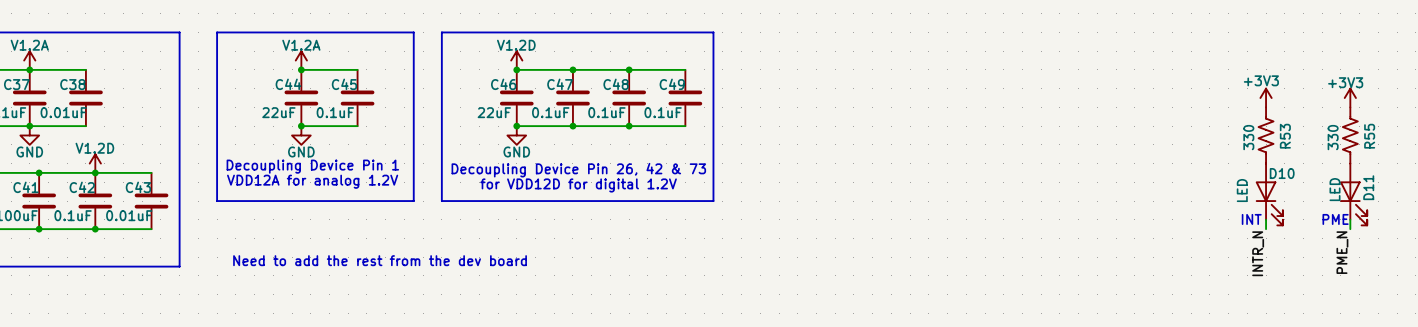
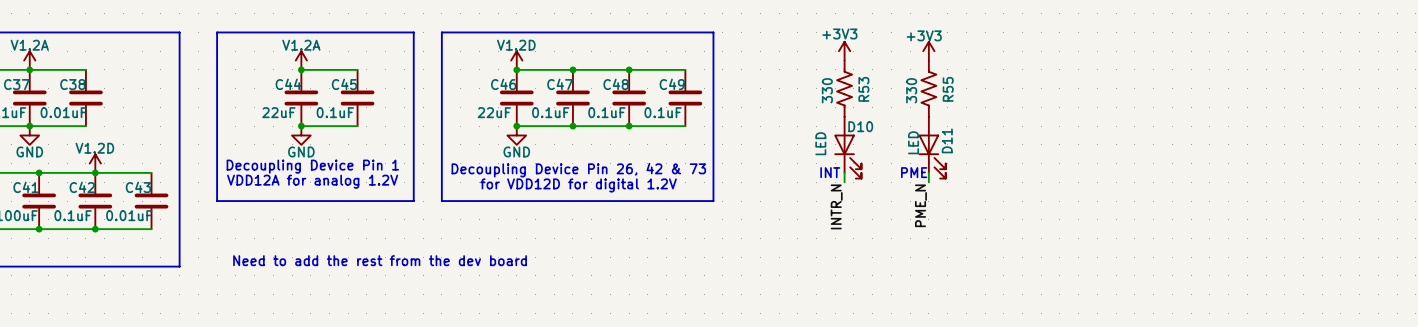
power symbol: none -> +3V3 (844, 51)
power symbol: none -> +3V3 (928, 51)
power symbol: +3V3 (1266, 98) -> none
power symbol: +3V3 (1350, 98) -> none
R53 position: (1266, 135) -> (844, 88)
R55 position: (1350, 135) -> (928, 88)
text: none -> INT (830, 172)
wire: none -> (844, 172) (844, 182)
text: none -> PME (914, 172)
wire: none -> (928, 172) (928, 182)
D10 position: (1269, 194) -> (847, 147)
D11 position: (1353, 194) -> (932, 147)
label: none -> PME_N (920, 205)
label: none -> INTR_N (836, 206)
text: INT (1251, 219) -> none
wire: (1266, 219) (1266, 229) -> none
text: PME (1335, 219) -> none
wire: (1350, 219) (1350, 229) -> none
label: PME_N (1342, 252) -> none
label: INTR_N (1258, 253) -> none

